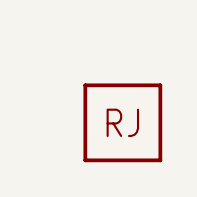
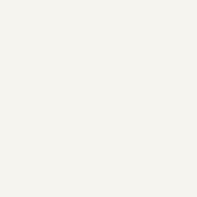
part: (122, 122) -> none

